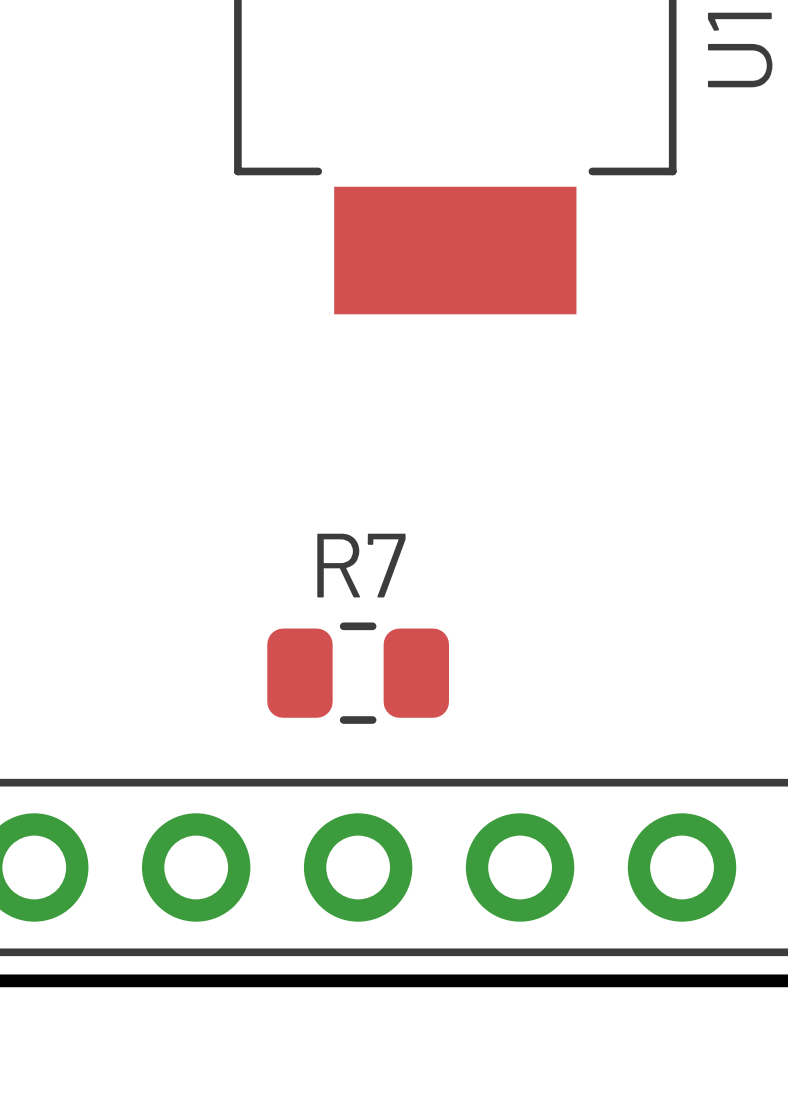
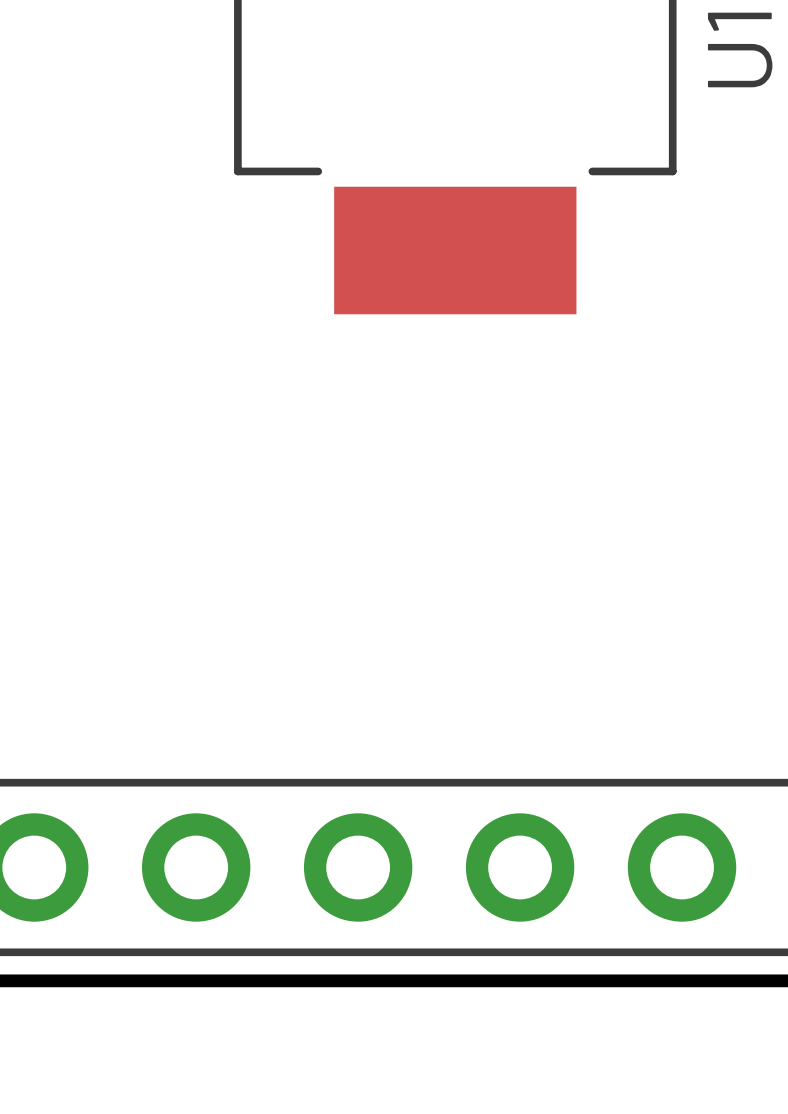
R7: (358, 673) -> none

